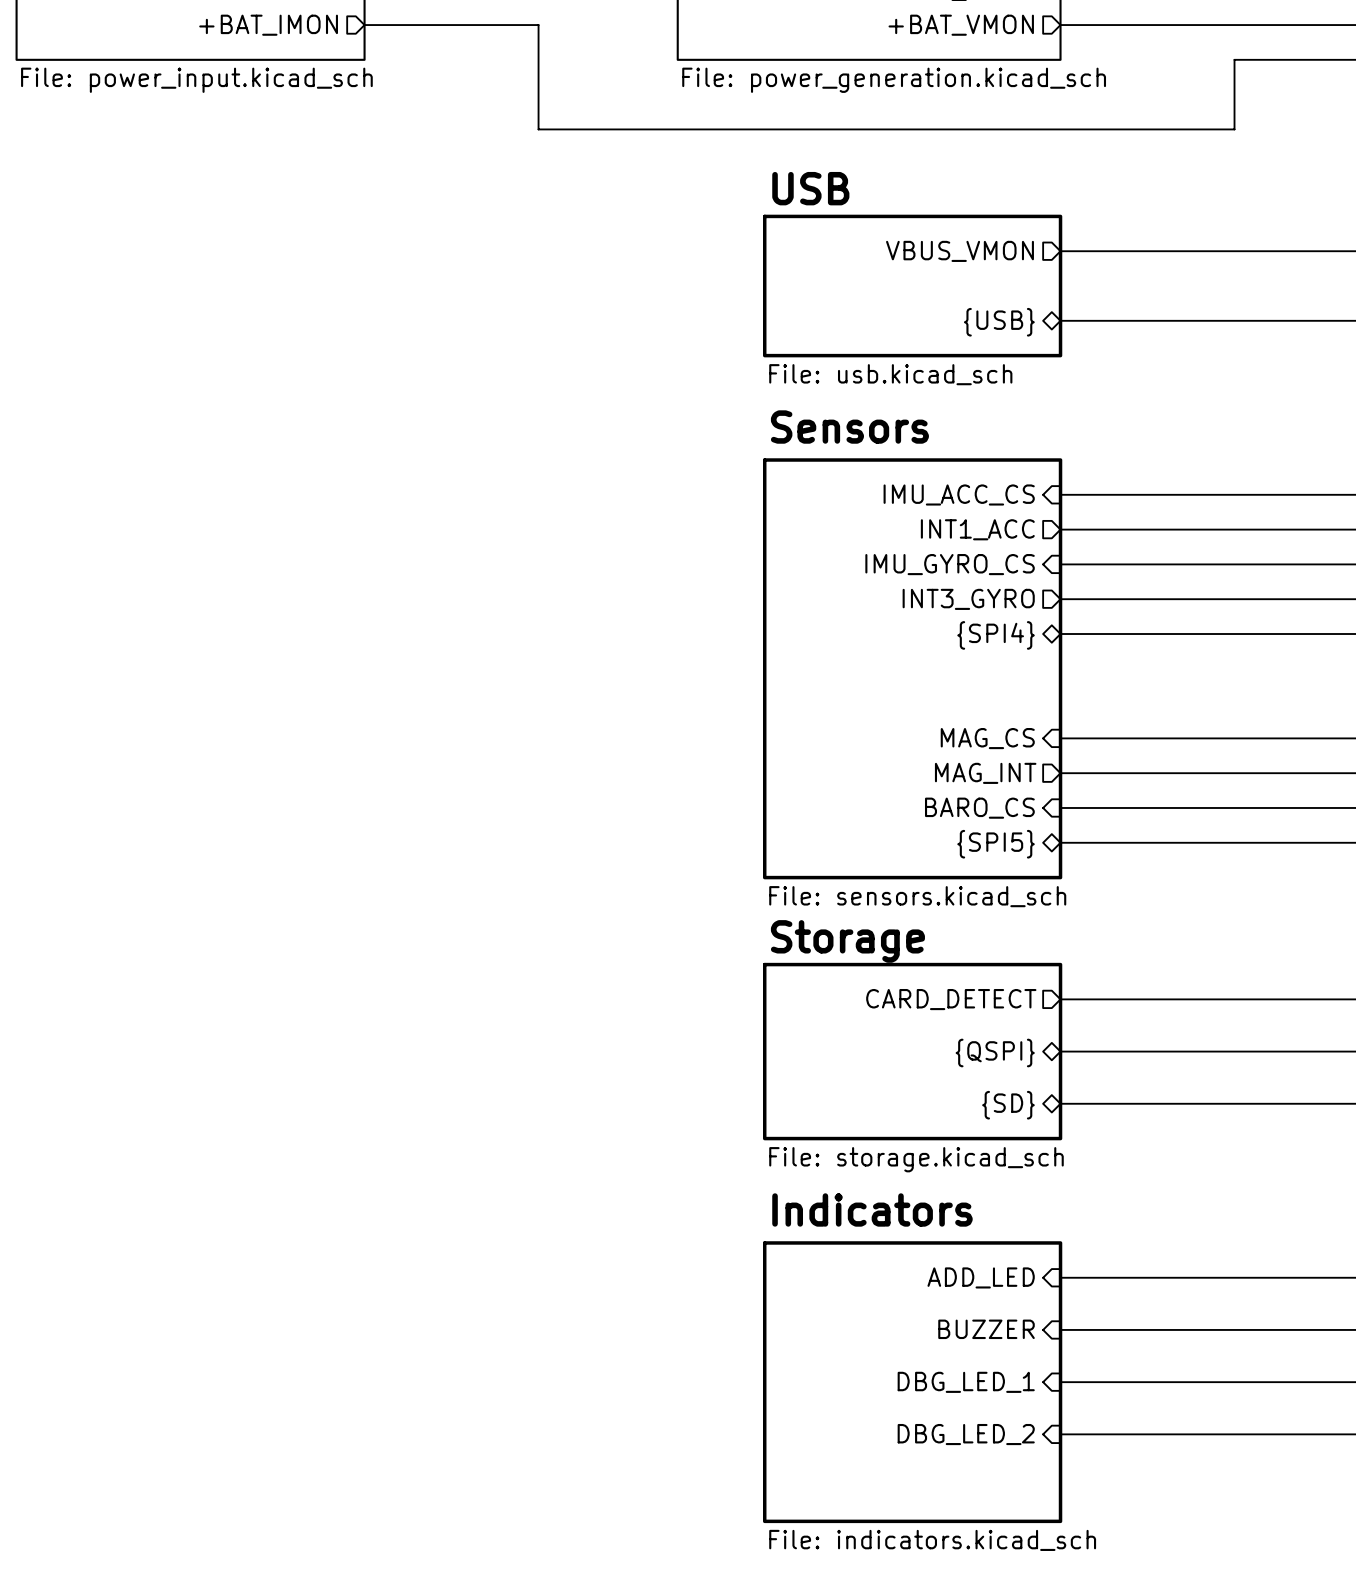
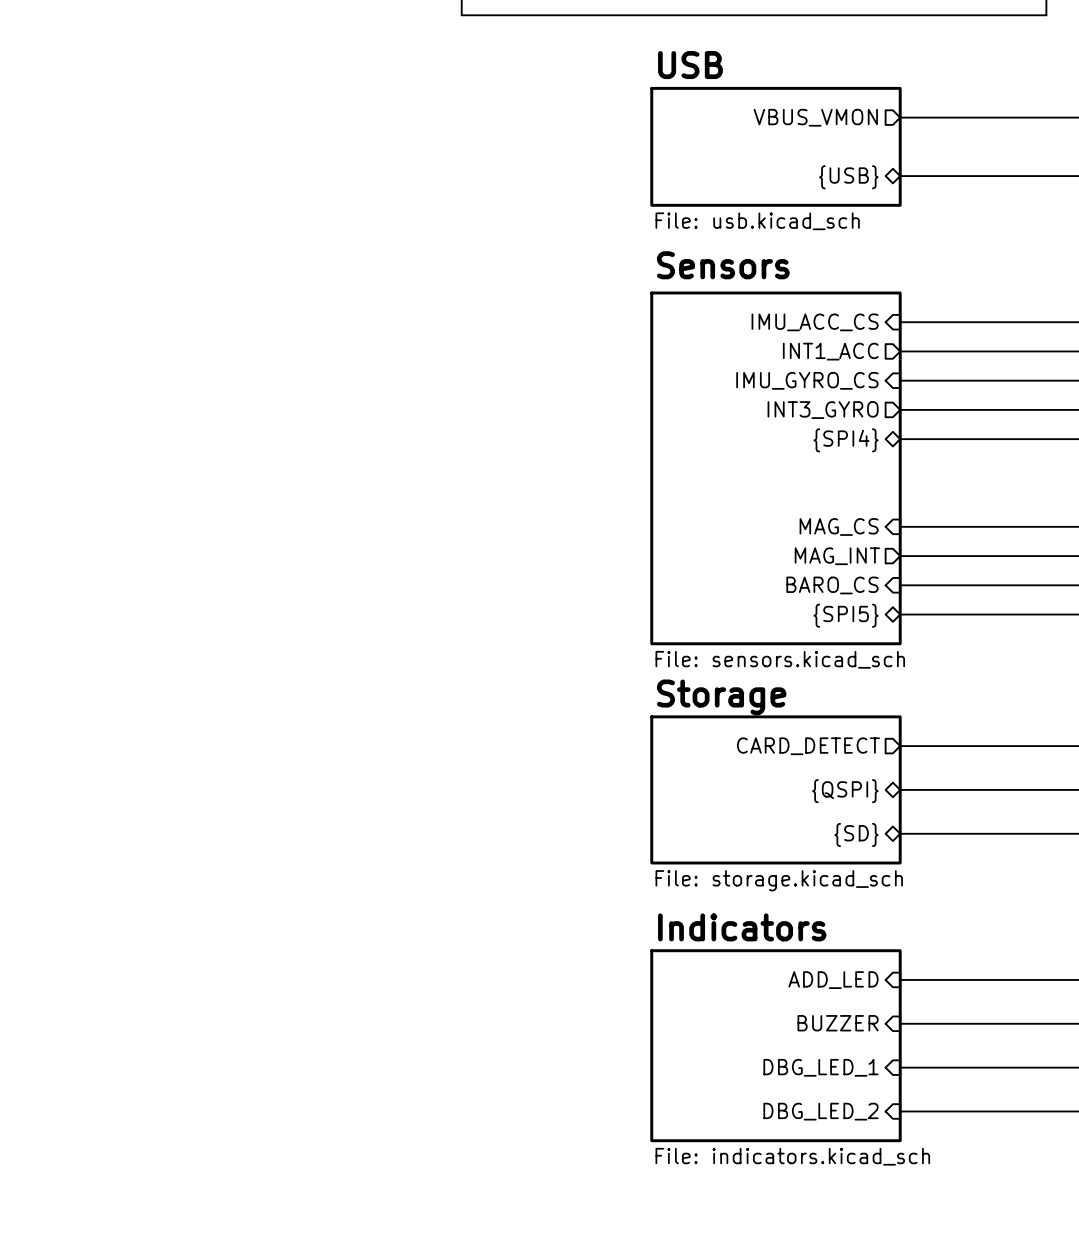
sheet Indicators: none -> File: indicators.kicad_sch (775, 1045)
sheet Indicators: File: indicators.kicad_sch (912, 1382) -> none

